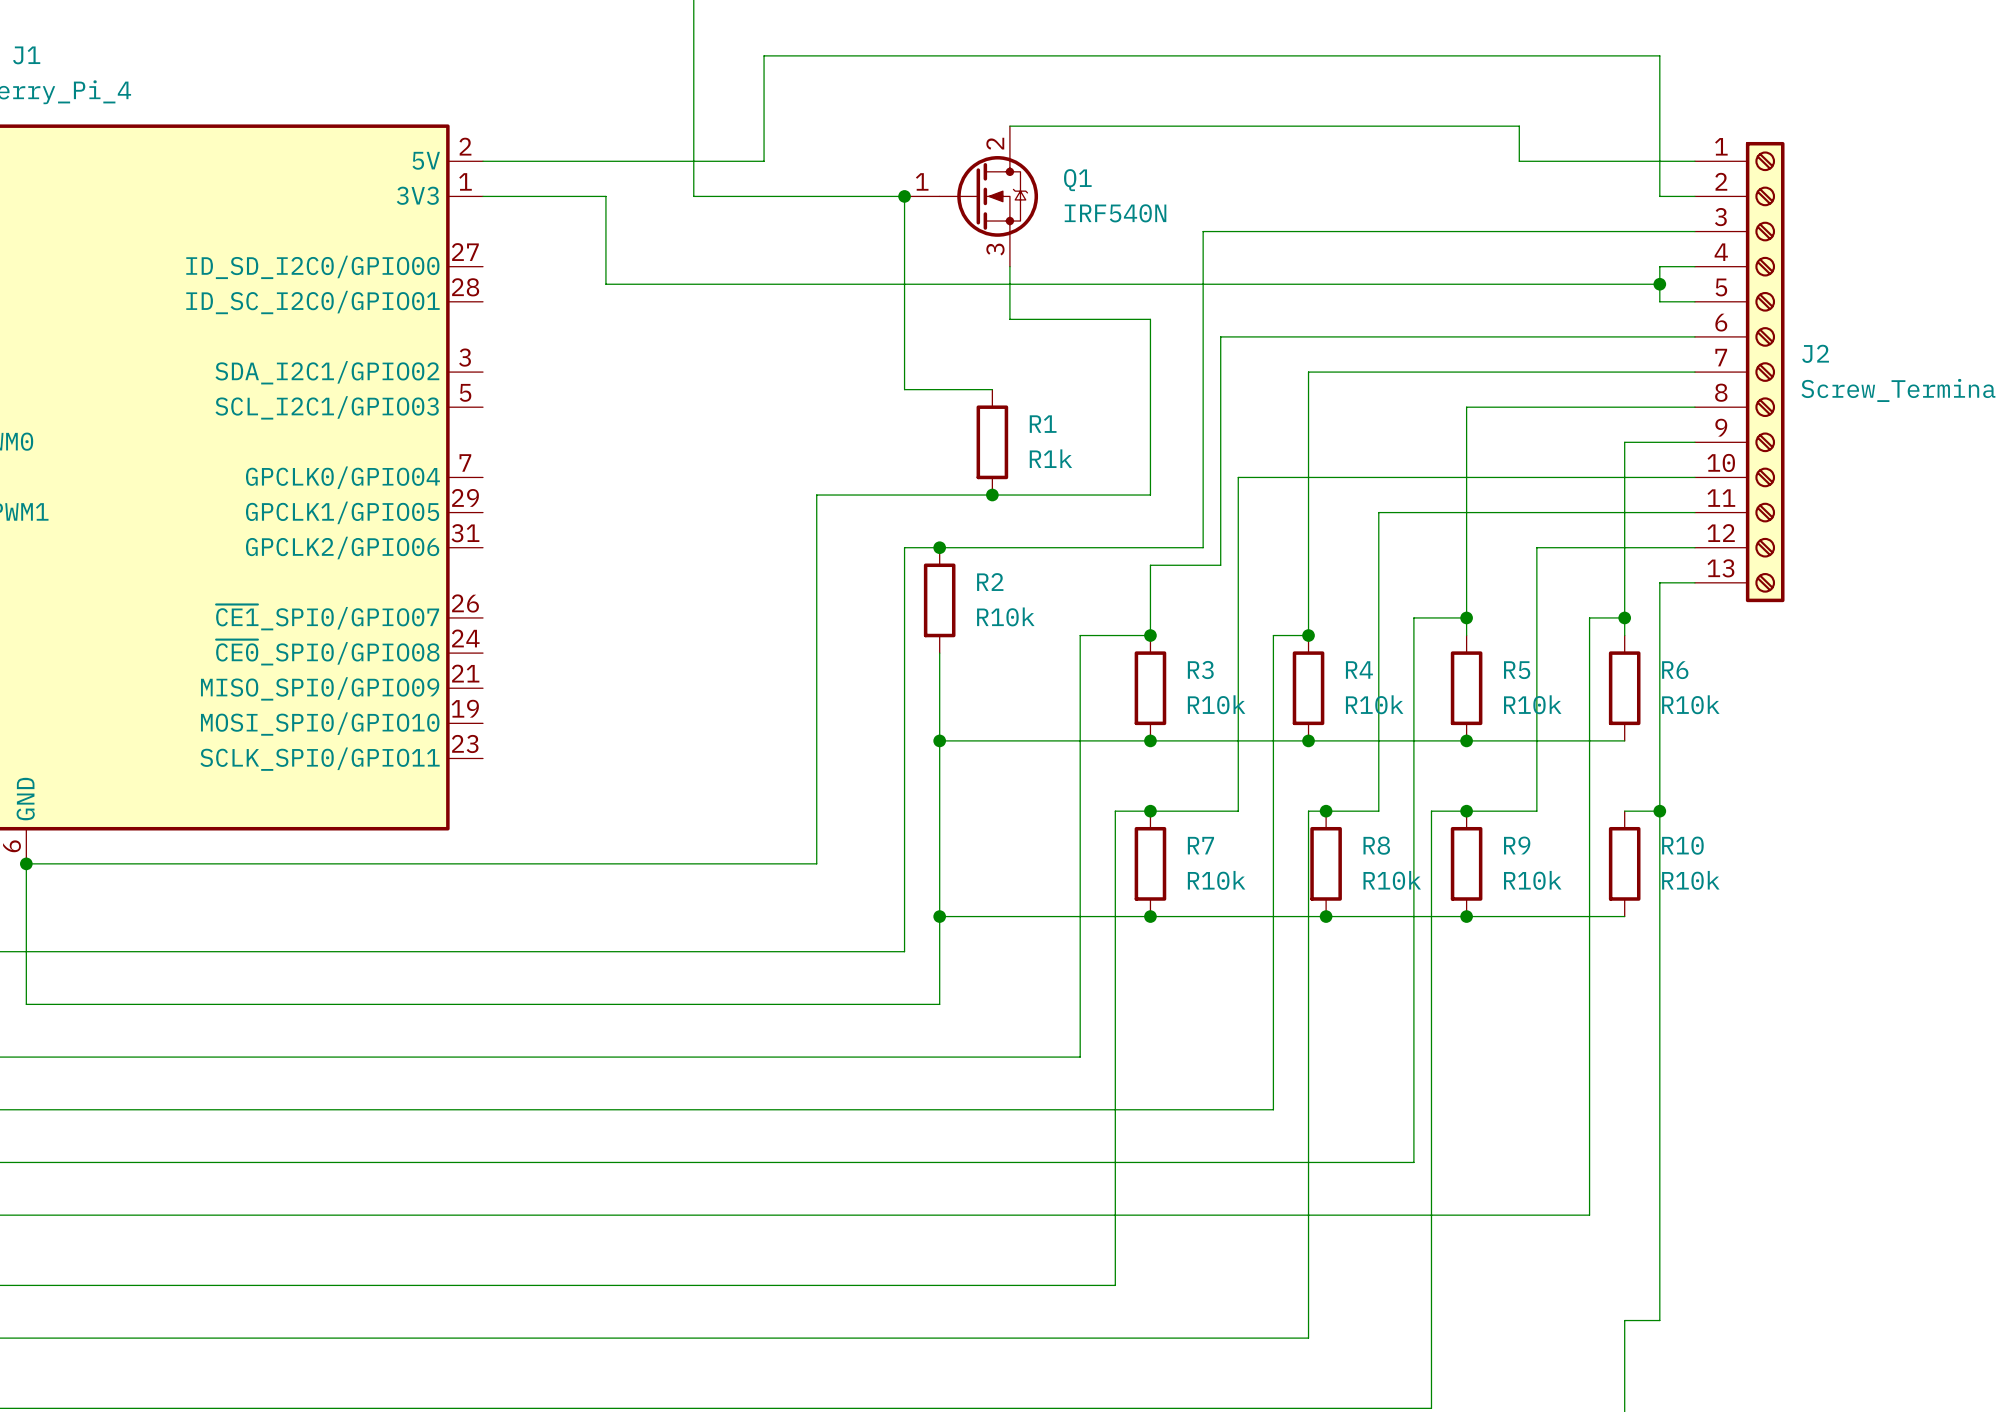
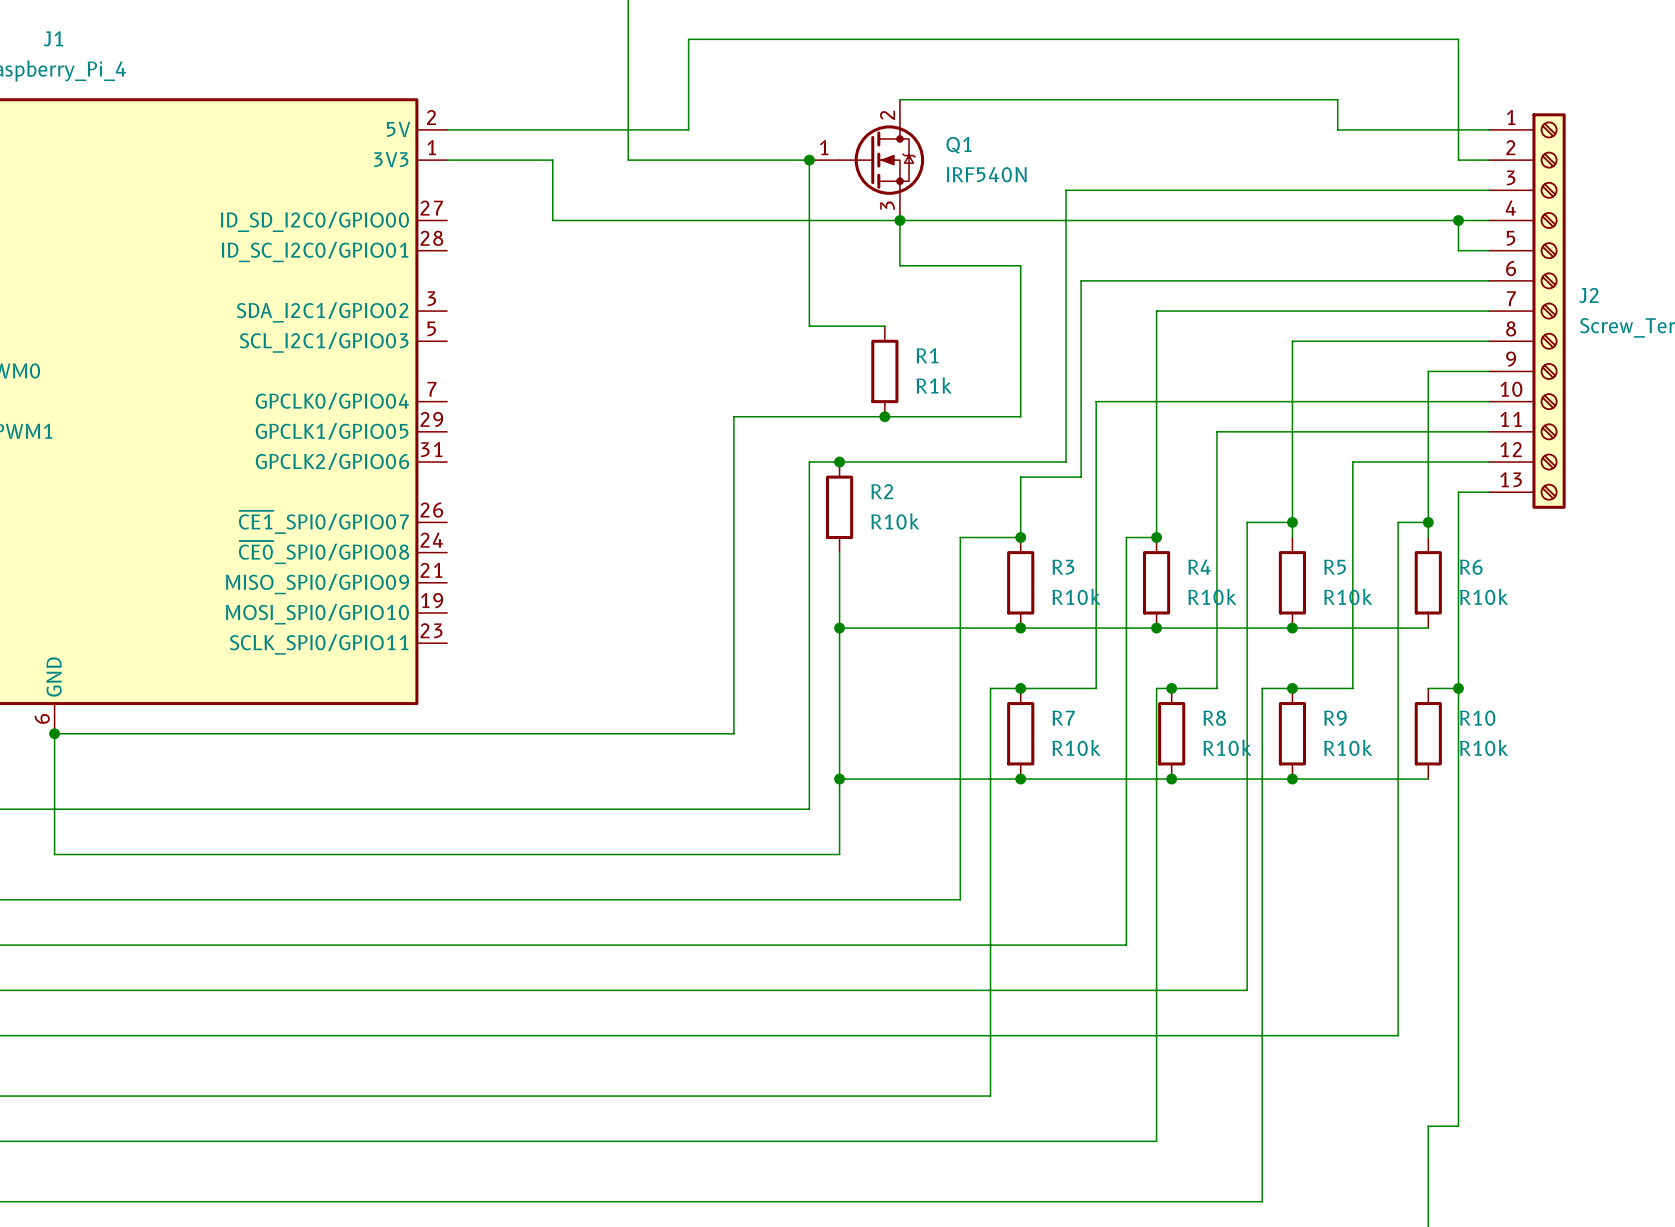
wire: (605, 266) (605, 284) (1659, 284) -> (552, 220) (1458, 220)
junction: none -> (899, 220)
junction position: (1659, 284) -> (1458, 220)

